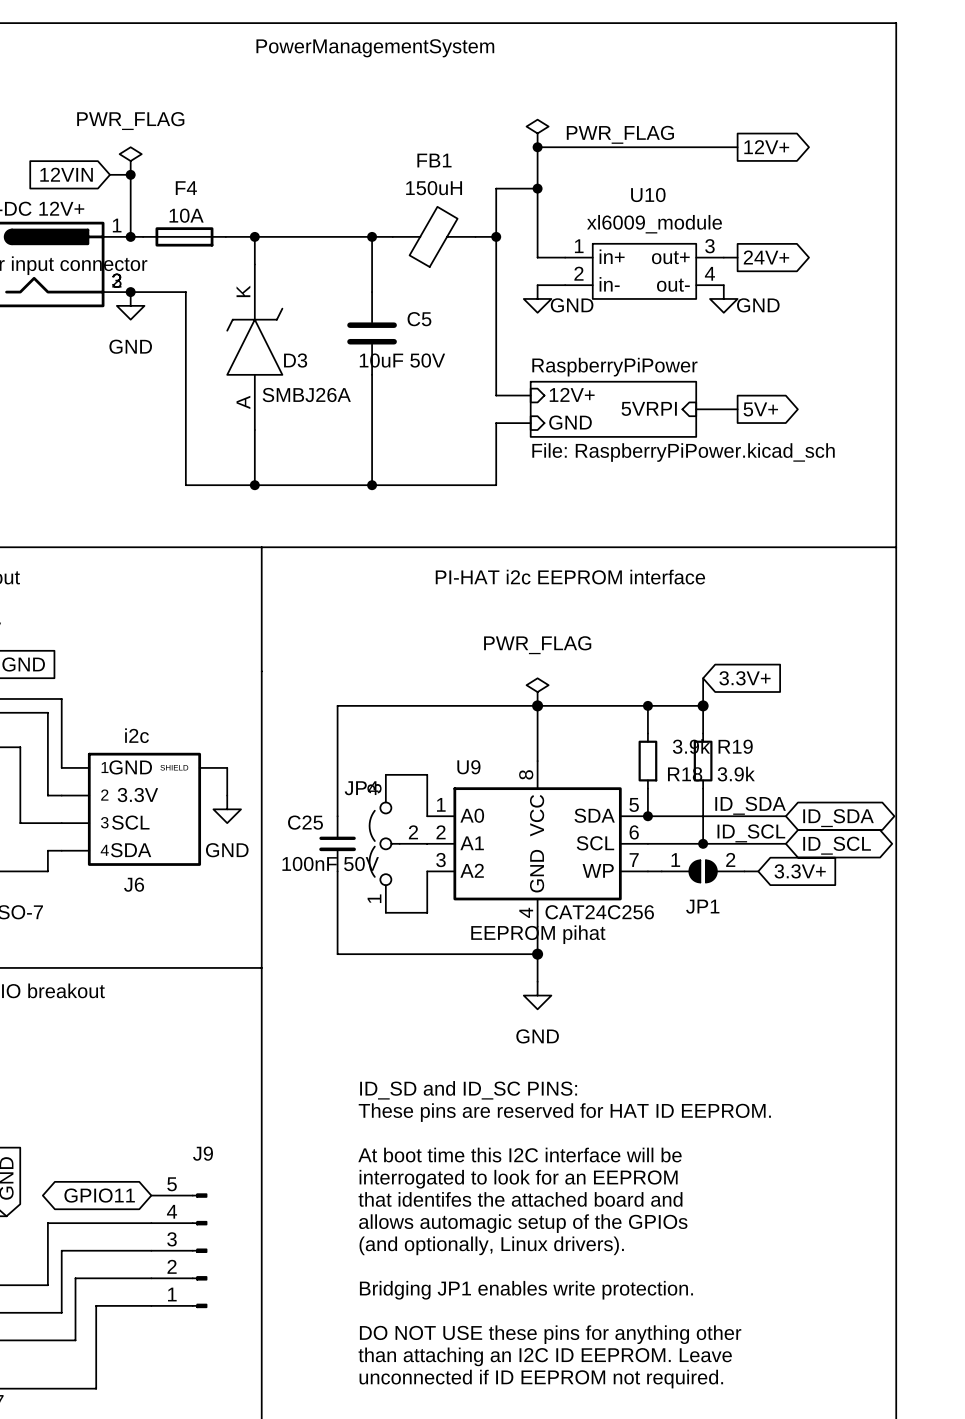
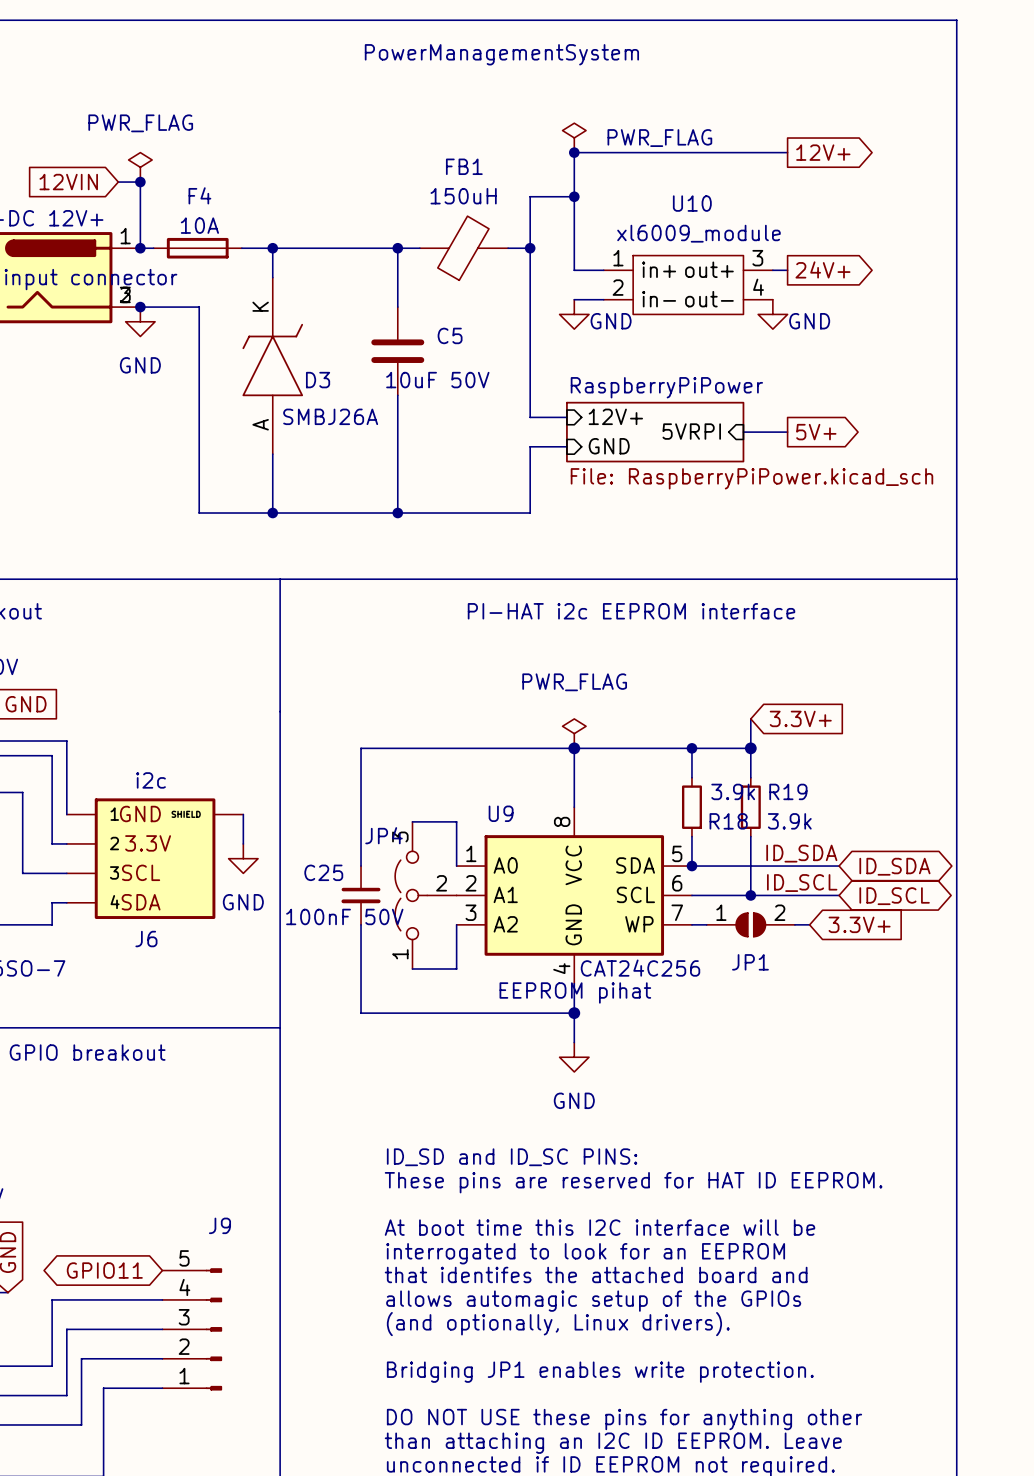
text position: PowerManagementSystem (375, 48) -> PowerManagementSystem (501, 54)

